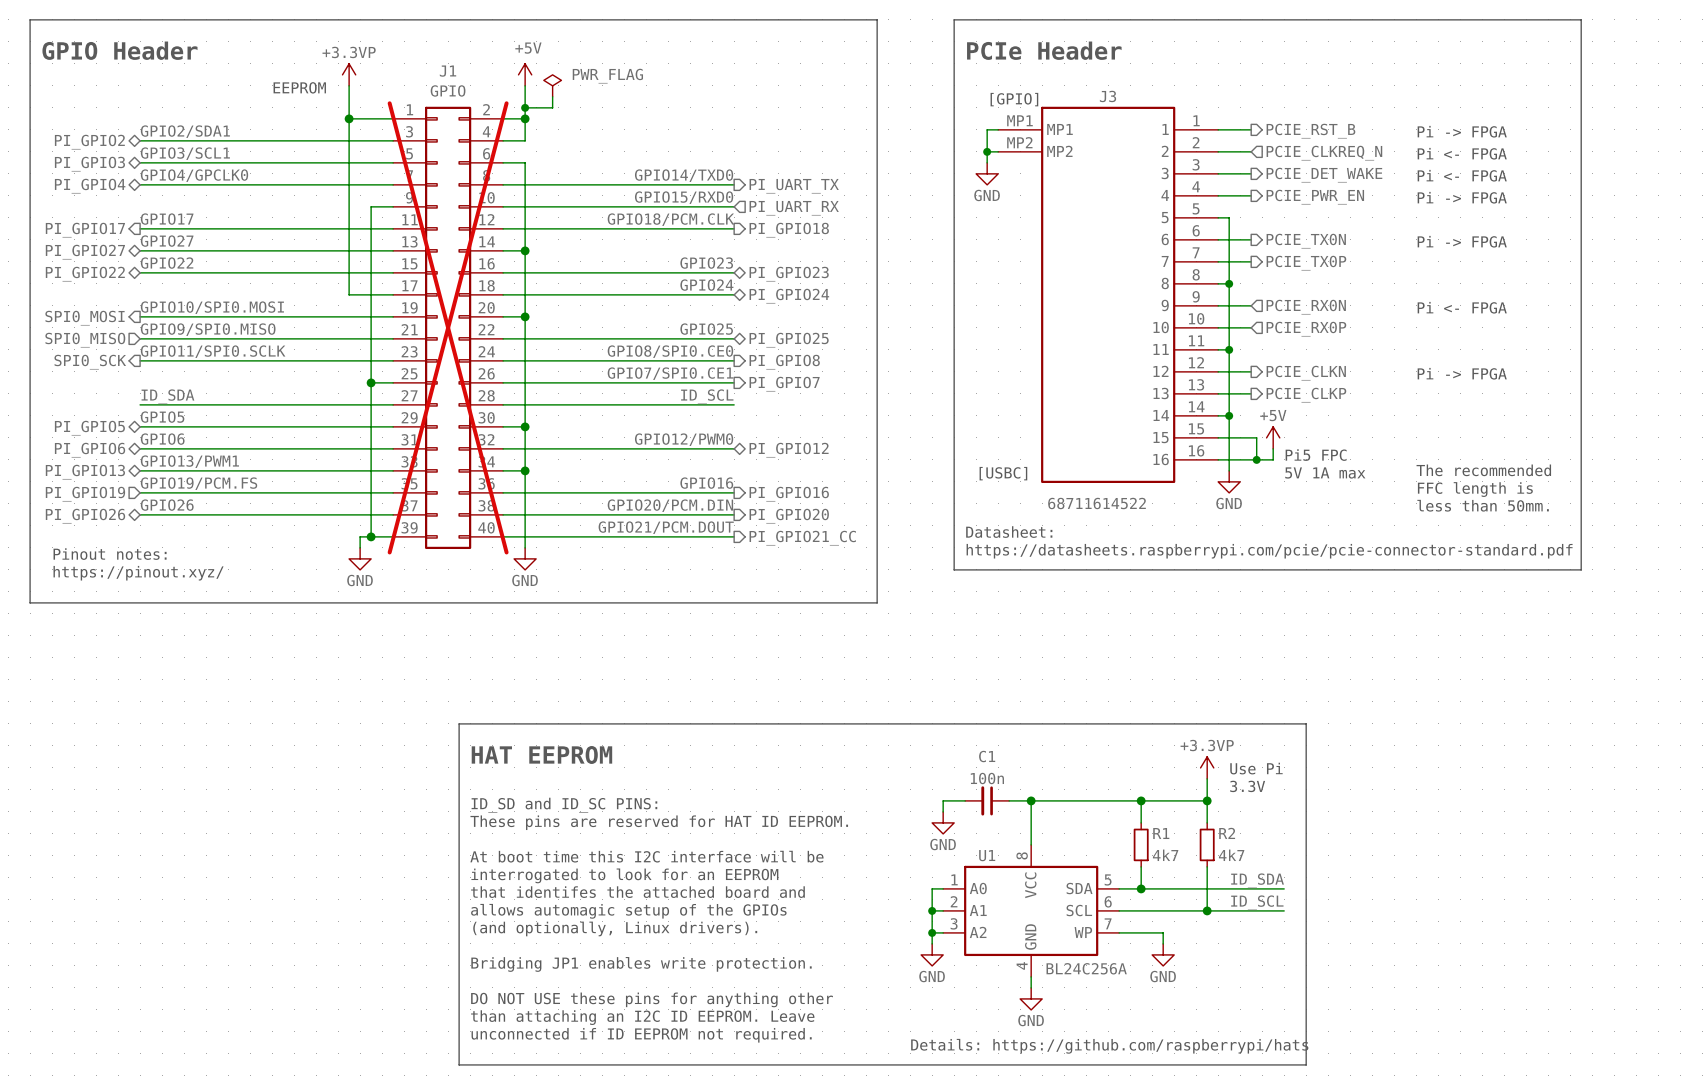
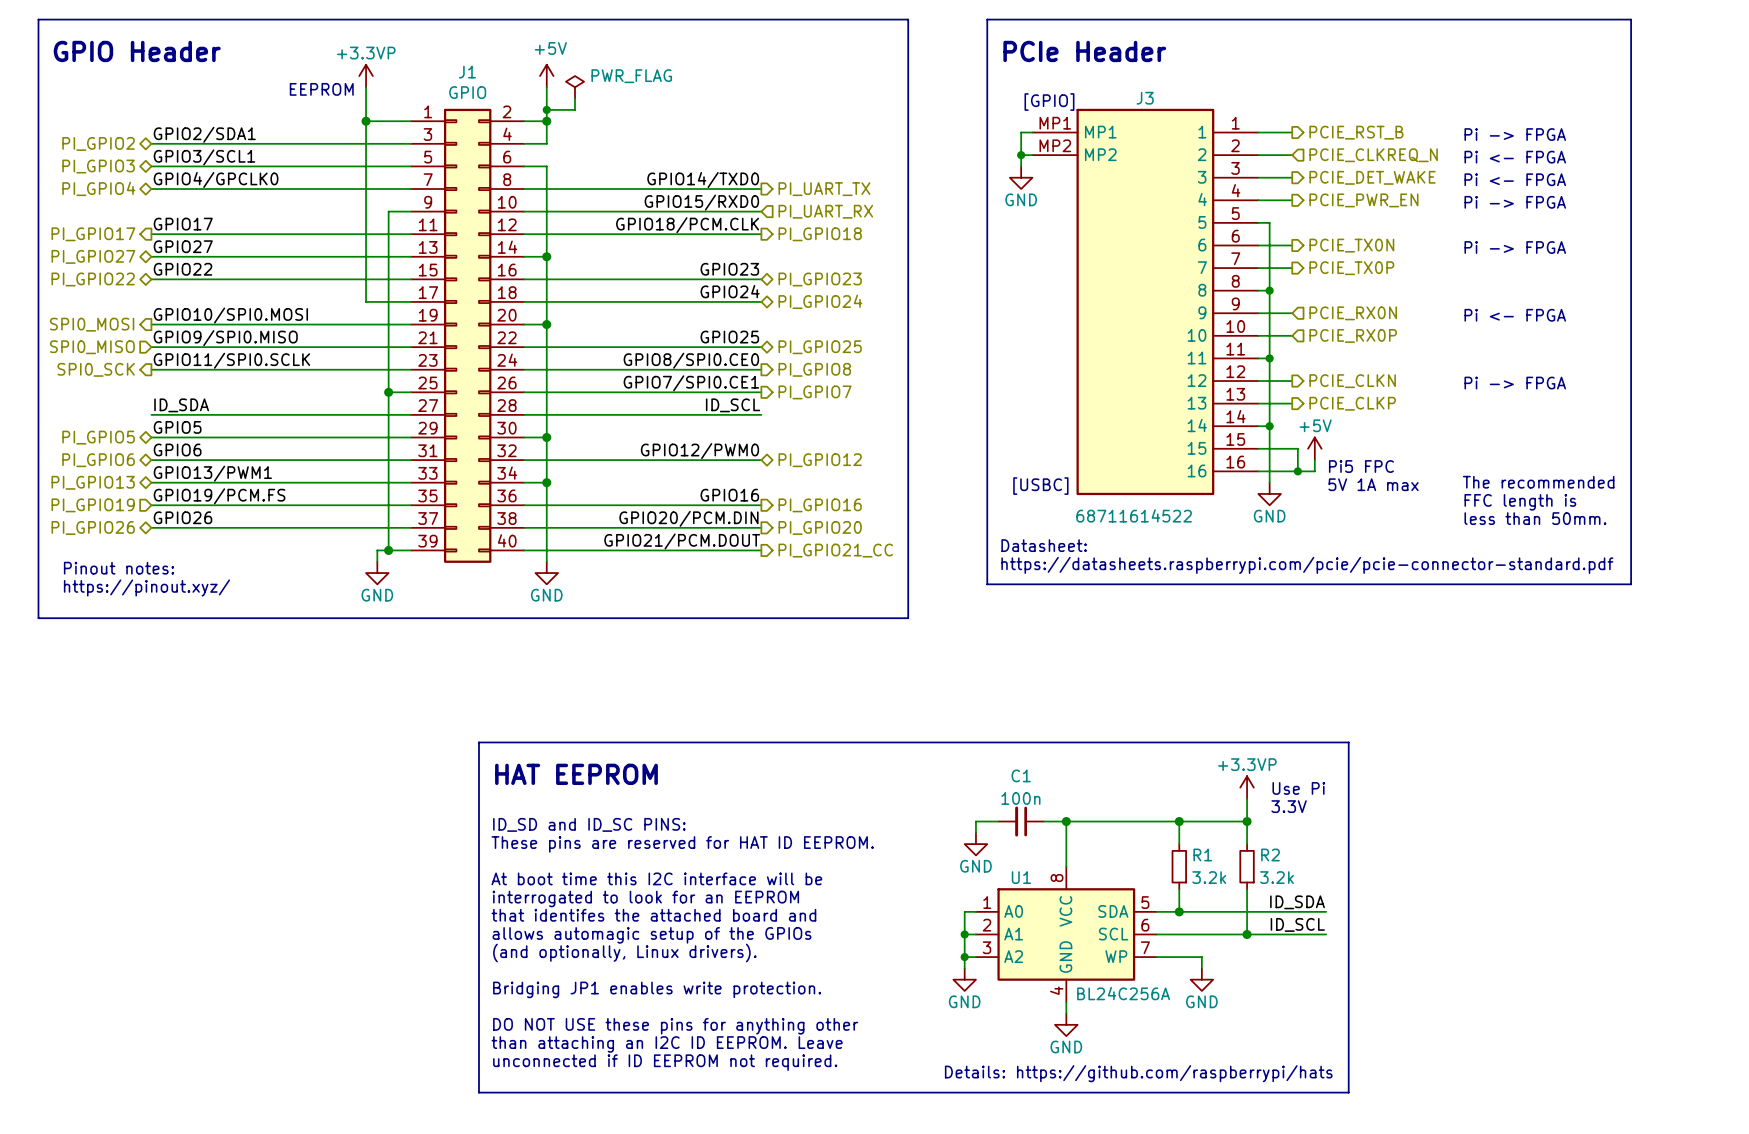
J1 do-not-place cross: (448, 327) -> none
R1 value: 4k7 (1165, 855) -> 3.2k (1209, 877)
R2 value: 4k7 (1231, 855) -> 3.2k (1276, 877)

